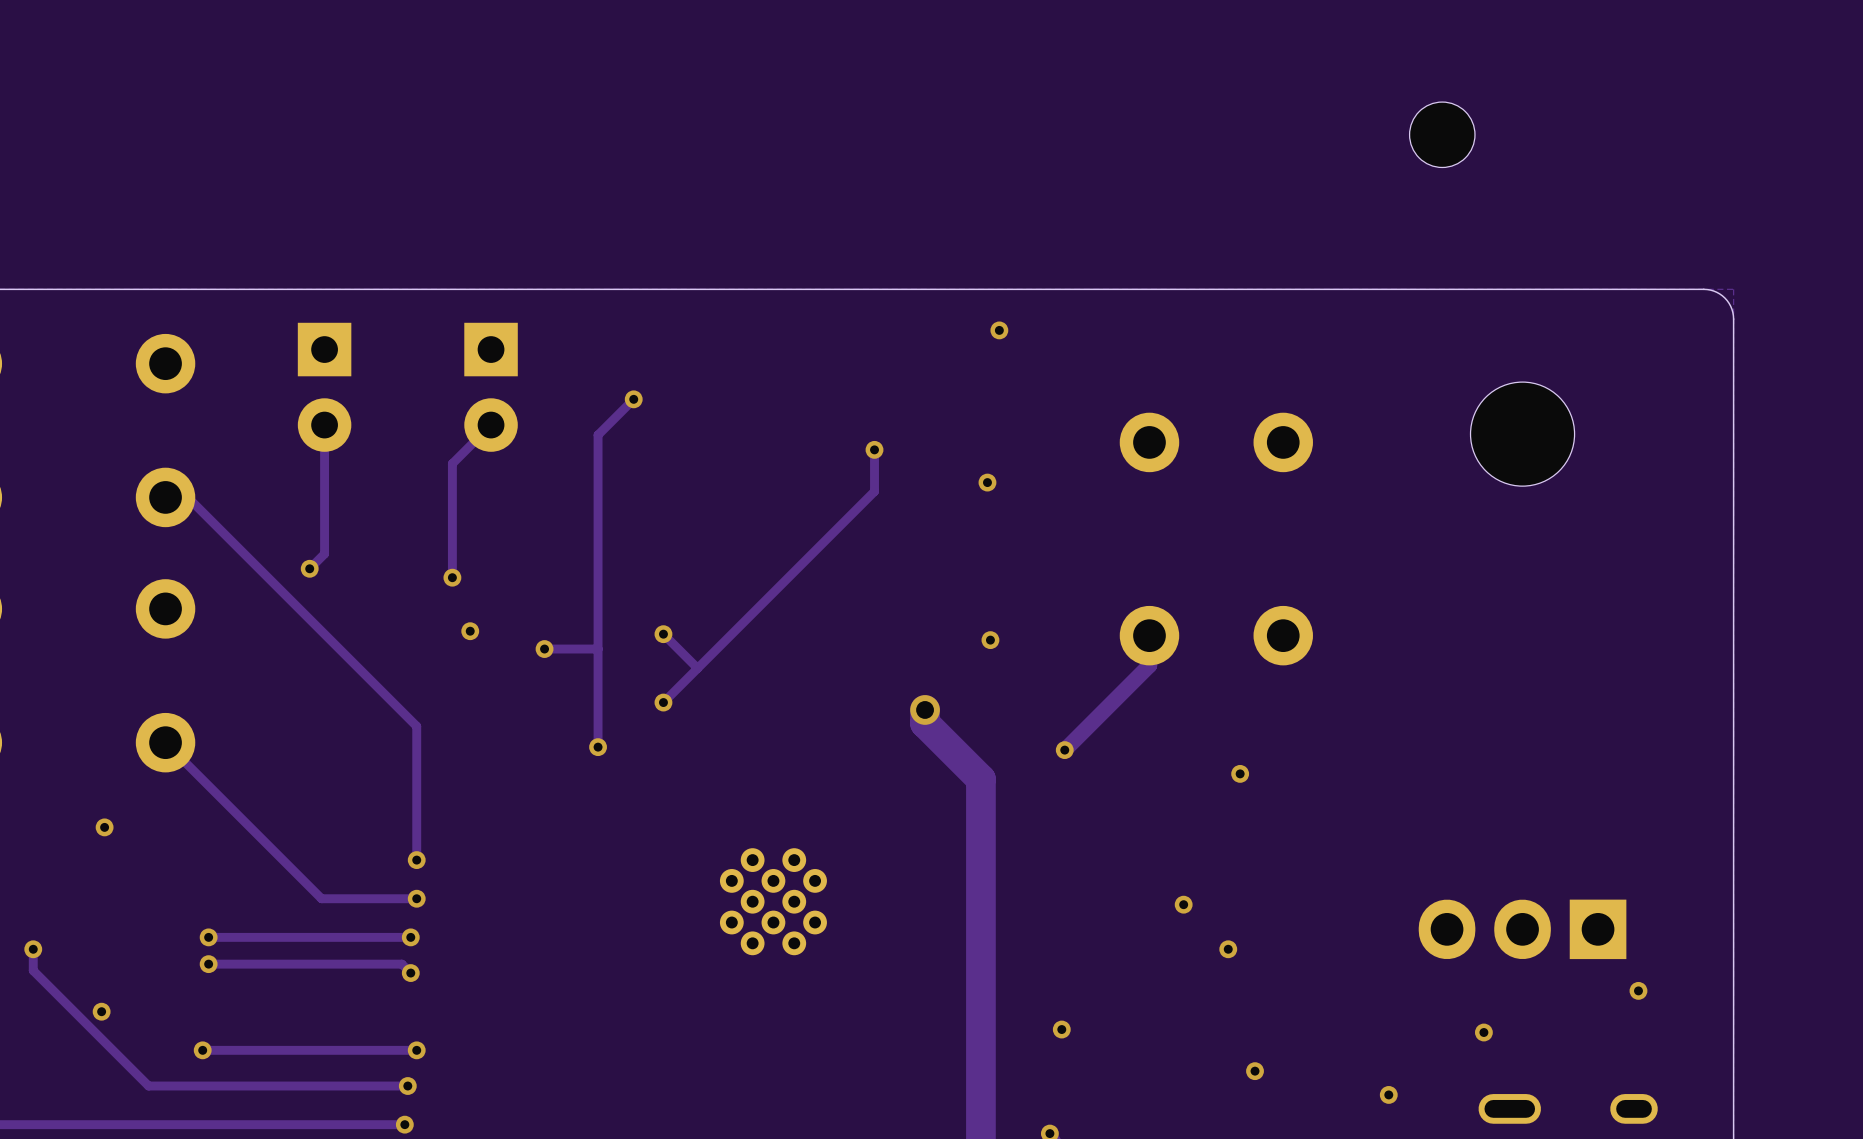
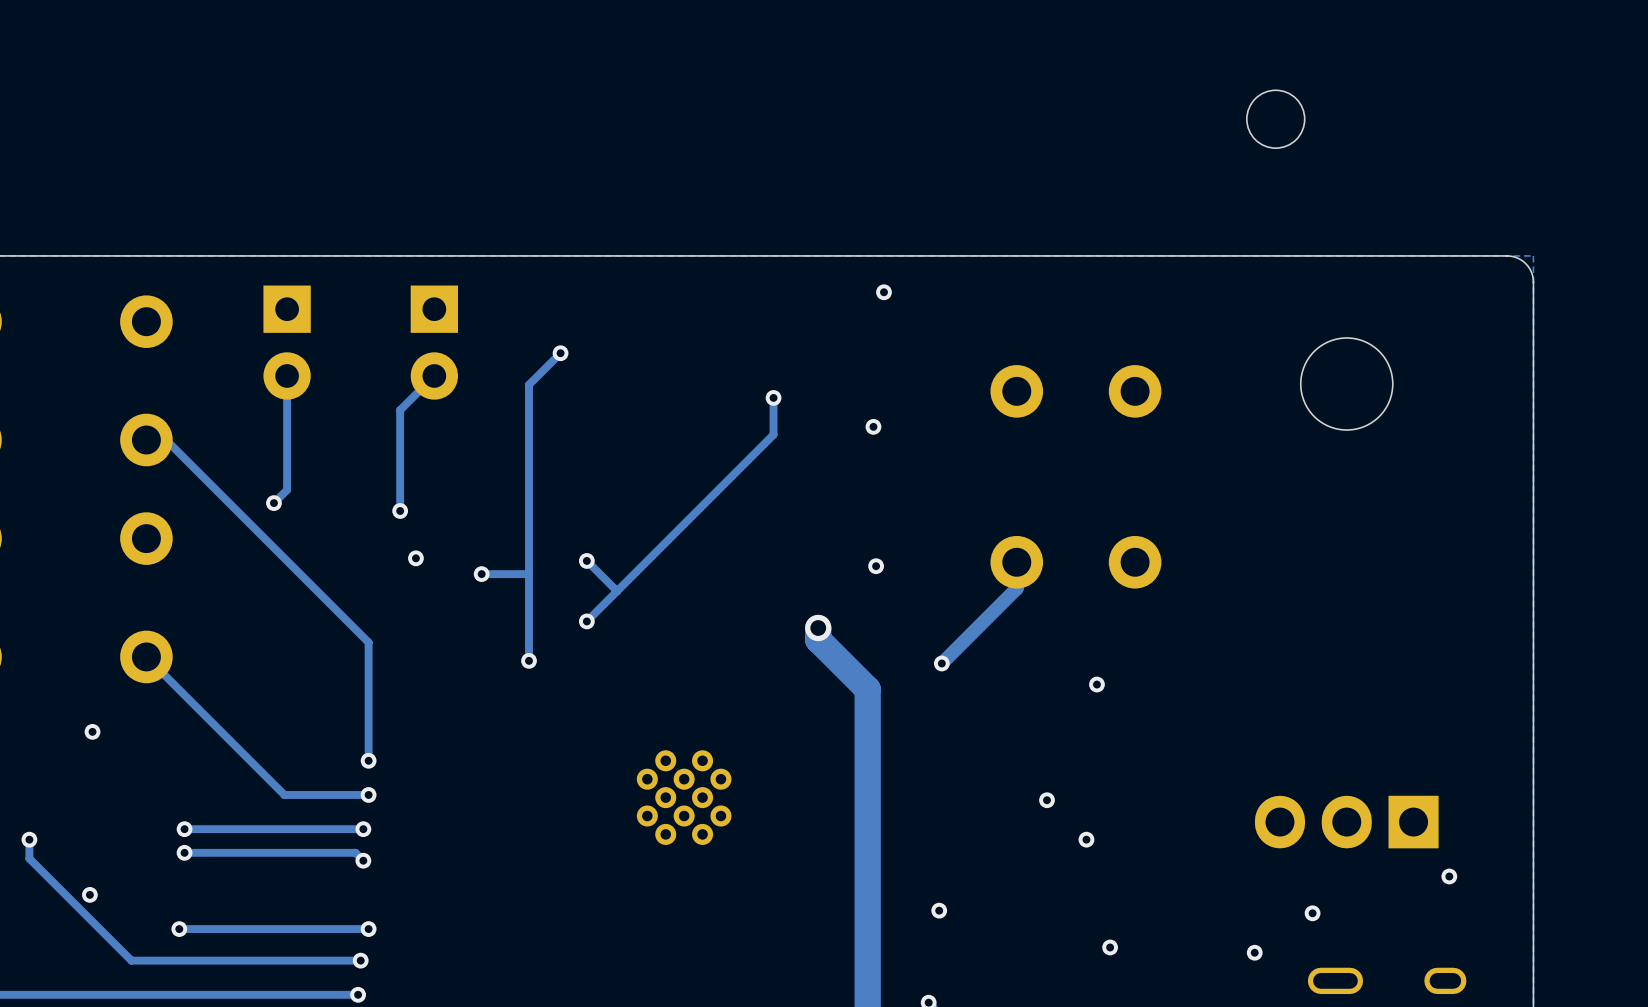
via position: (1388, 1094) -> (1254, 952)

